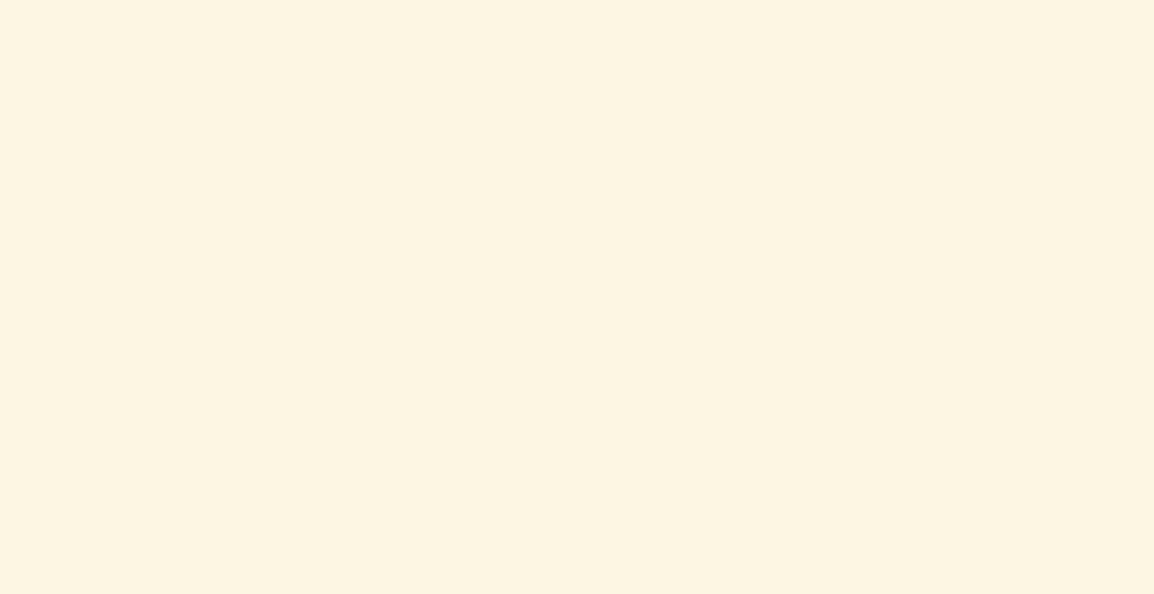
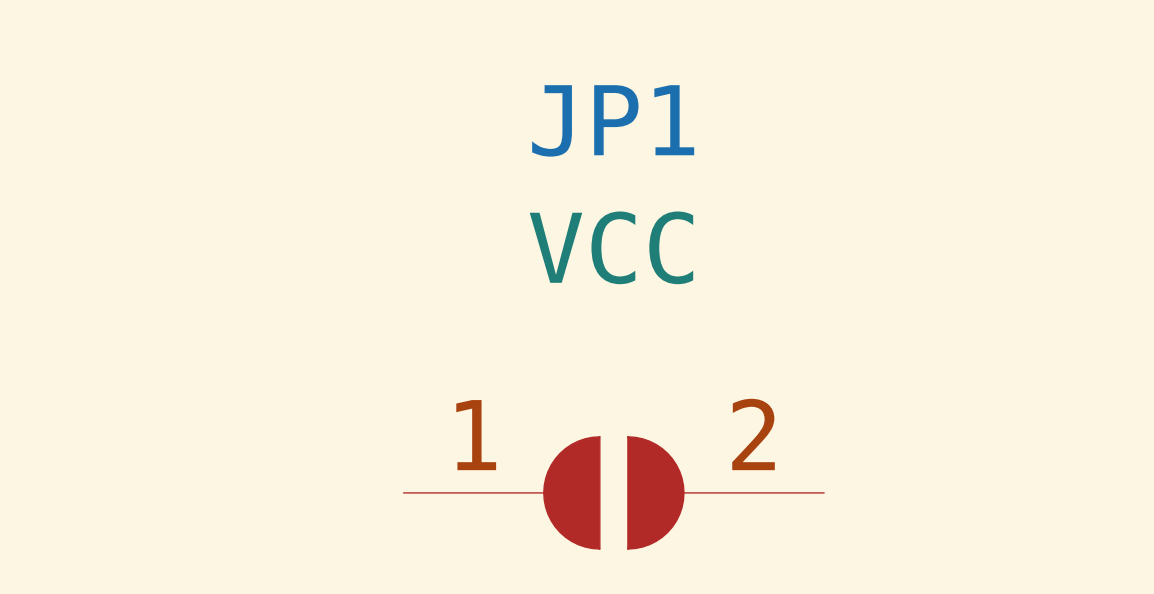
JP1: none -> VCC (613, 492)

